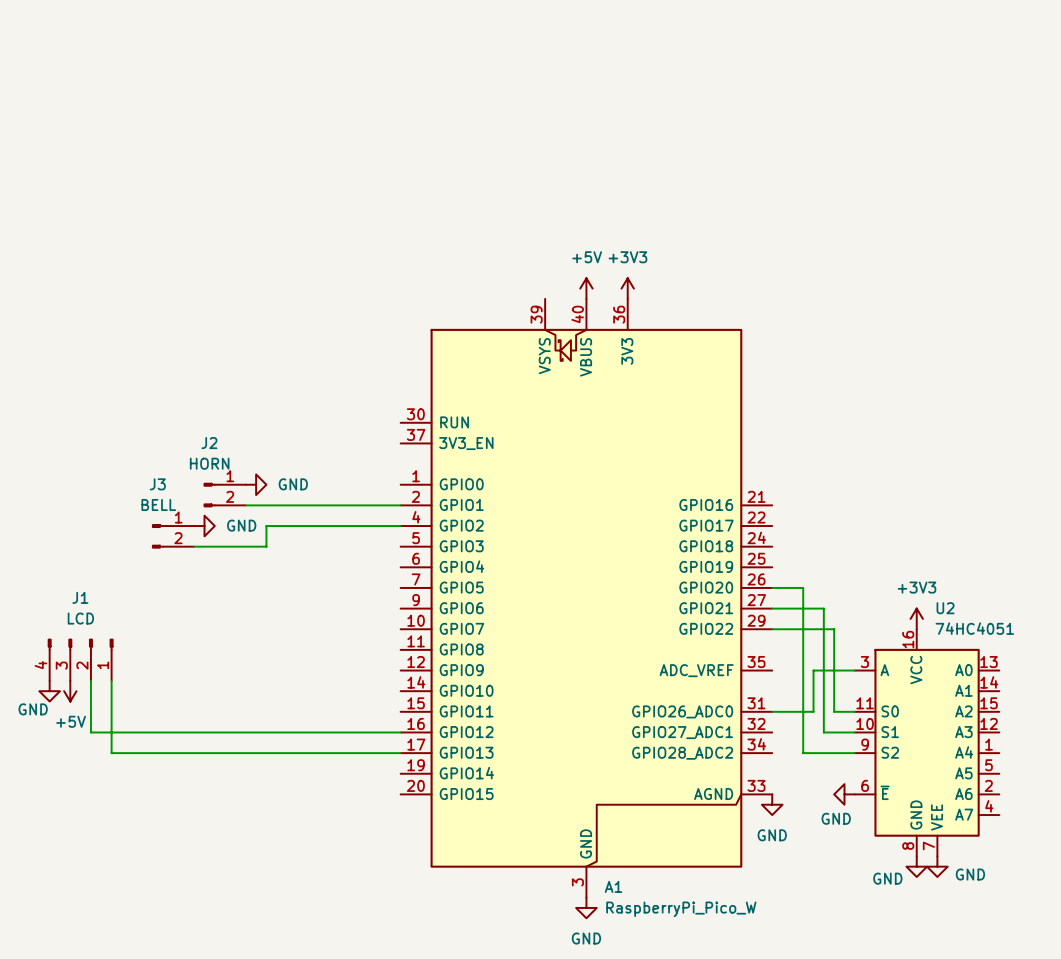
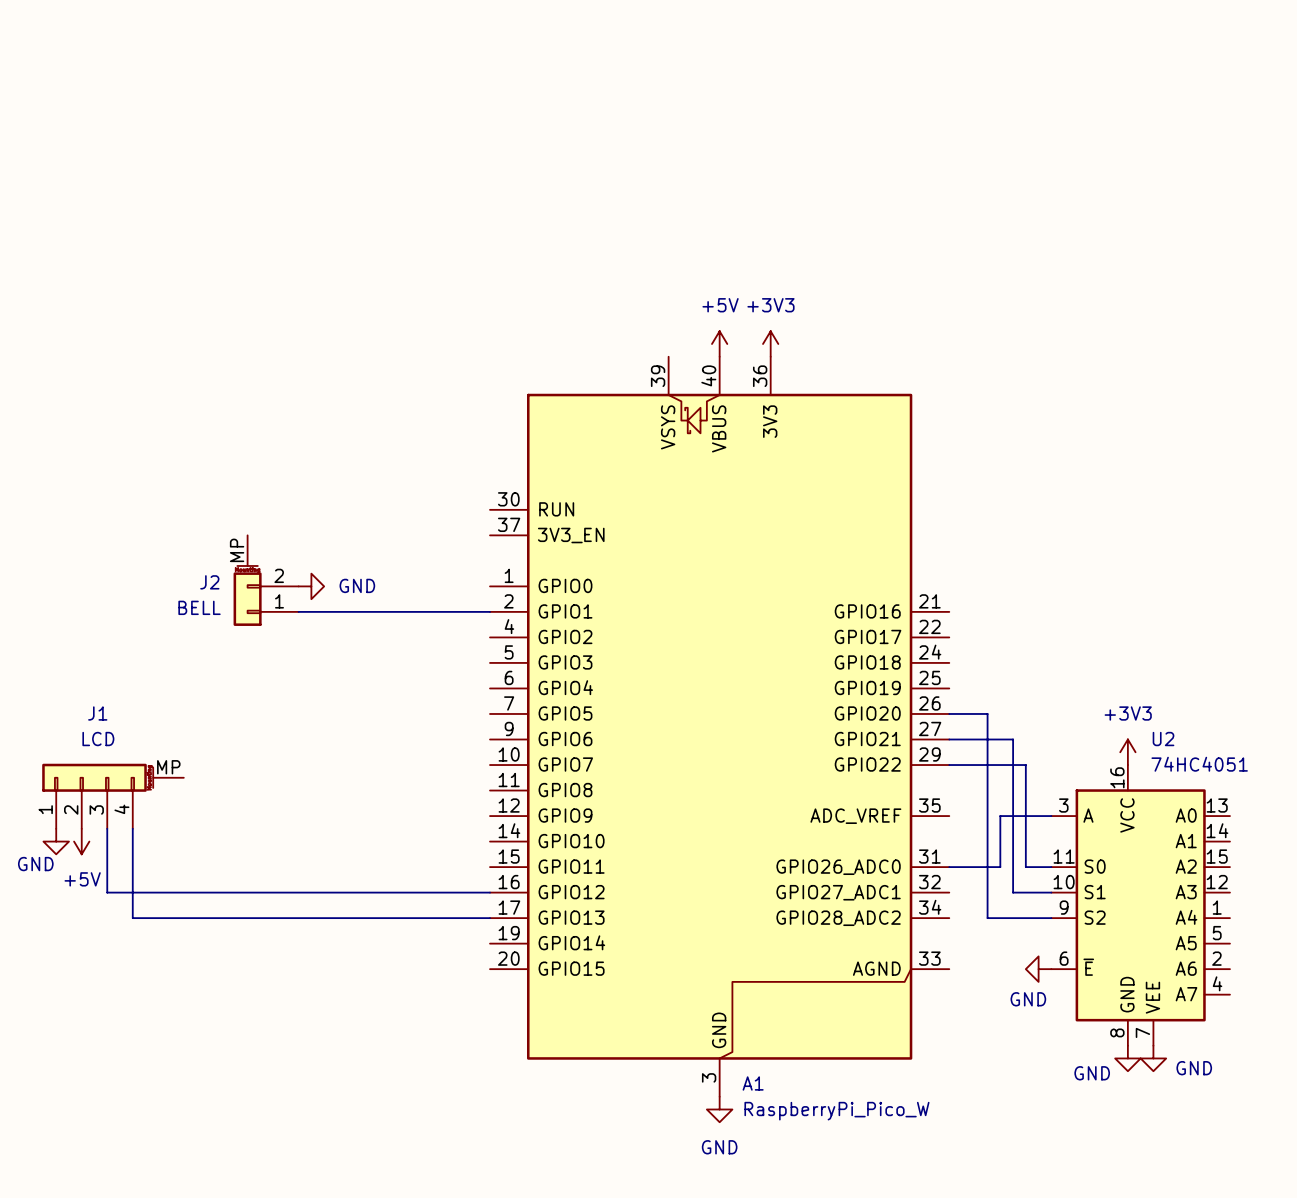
J2 name position: J2 (209, 443) -> J2 (209, 582)
J2 value: HORN (209, 463) -> BELL (199, 607)
J2 symbol: [203, 483, 246, 508] -> [233, 535, 299, 626]
power symbol: GND (204, 526) -> none
wire: (400, 526) (266, 526) (266, 546) (194, 546) -> none
J3: BELL (173, 536) -> none
J1 symbol: [48, 638, 114, 681] -> [42, 763, 184, 829]
power symbol: GND (772, 804) -> none

